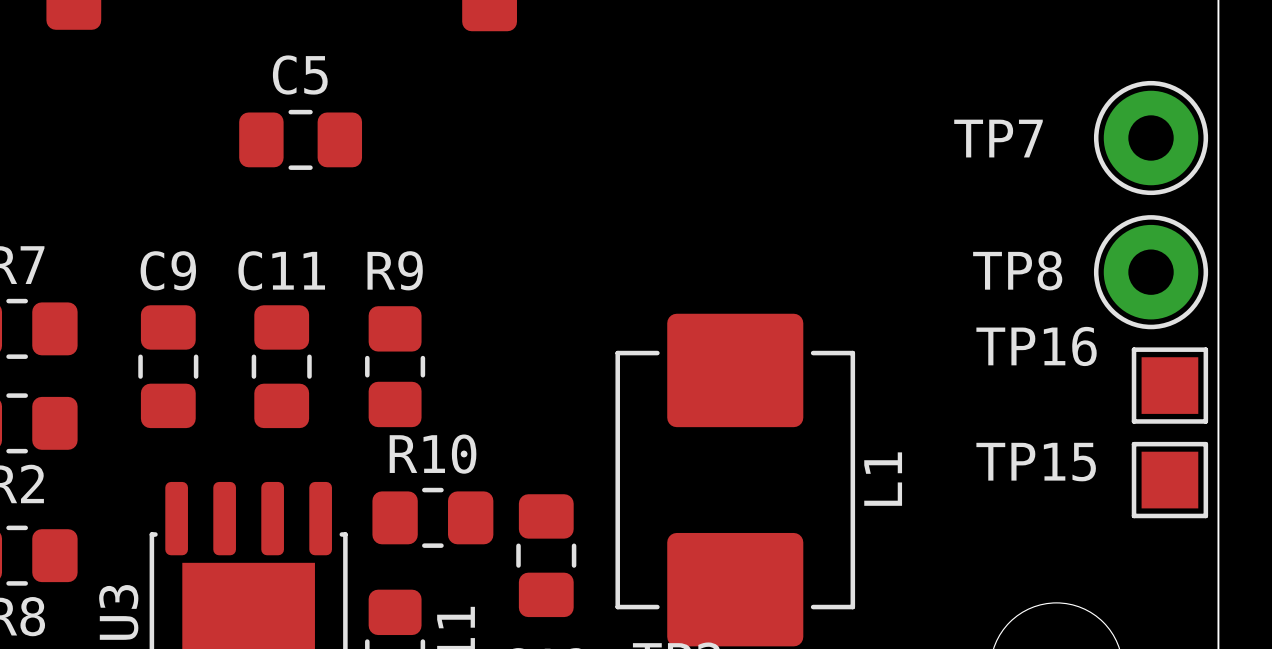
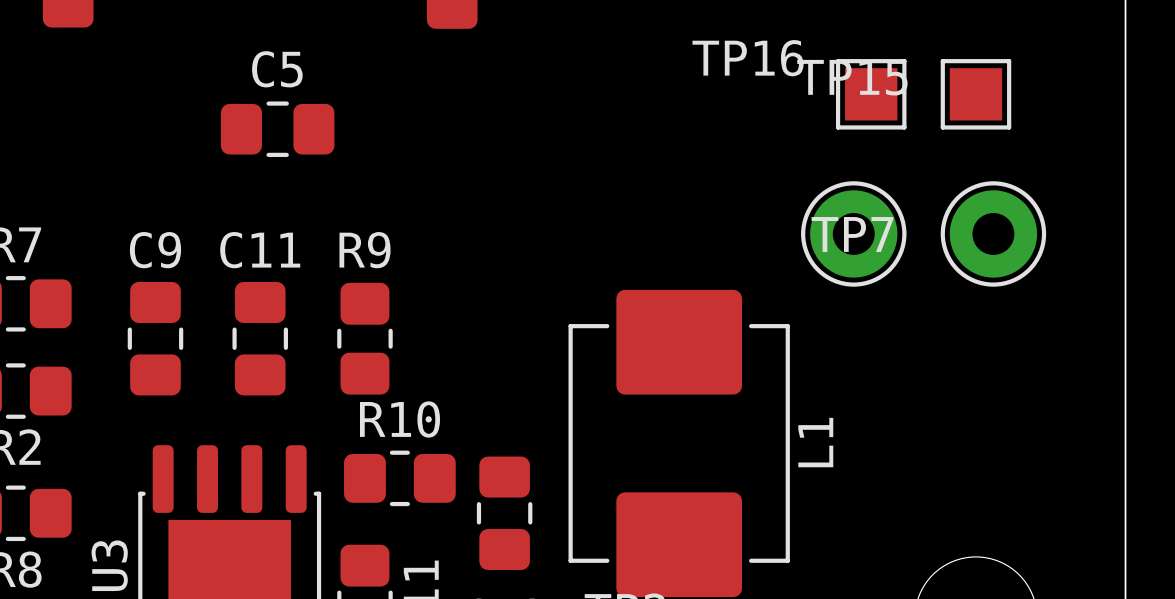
TP7 position: (1151, 138) -> (993, 233)
part: none -> (853, 233)
TP8: (1151, 272) -> none
TP16 position: (1169, 385) -> (871, 94)
TP15 position: (1169, 480) -> (975, 94)

